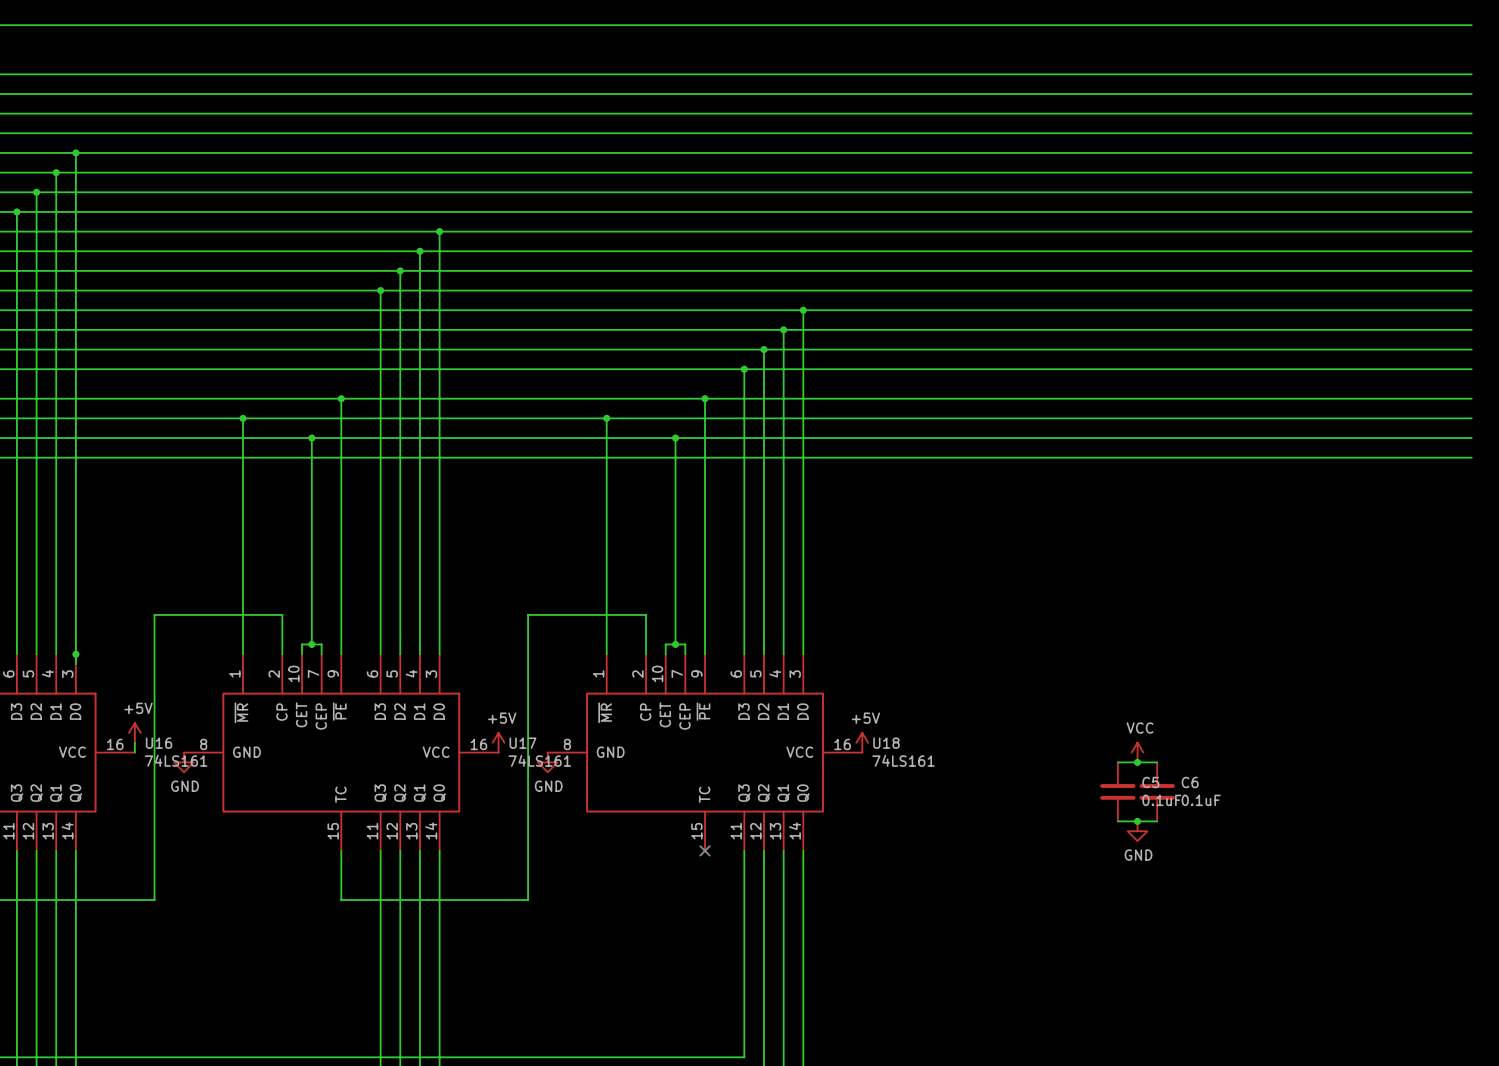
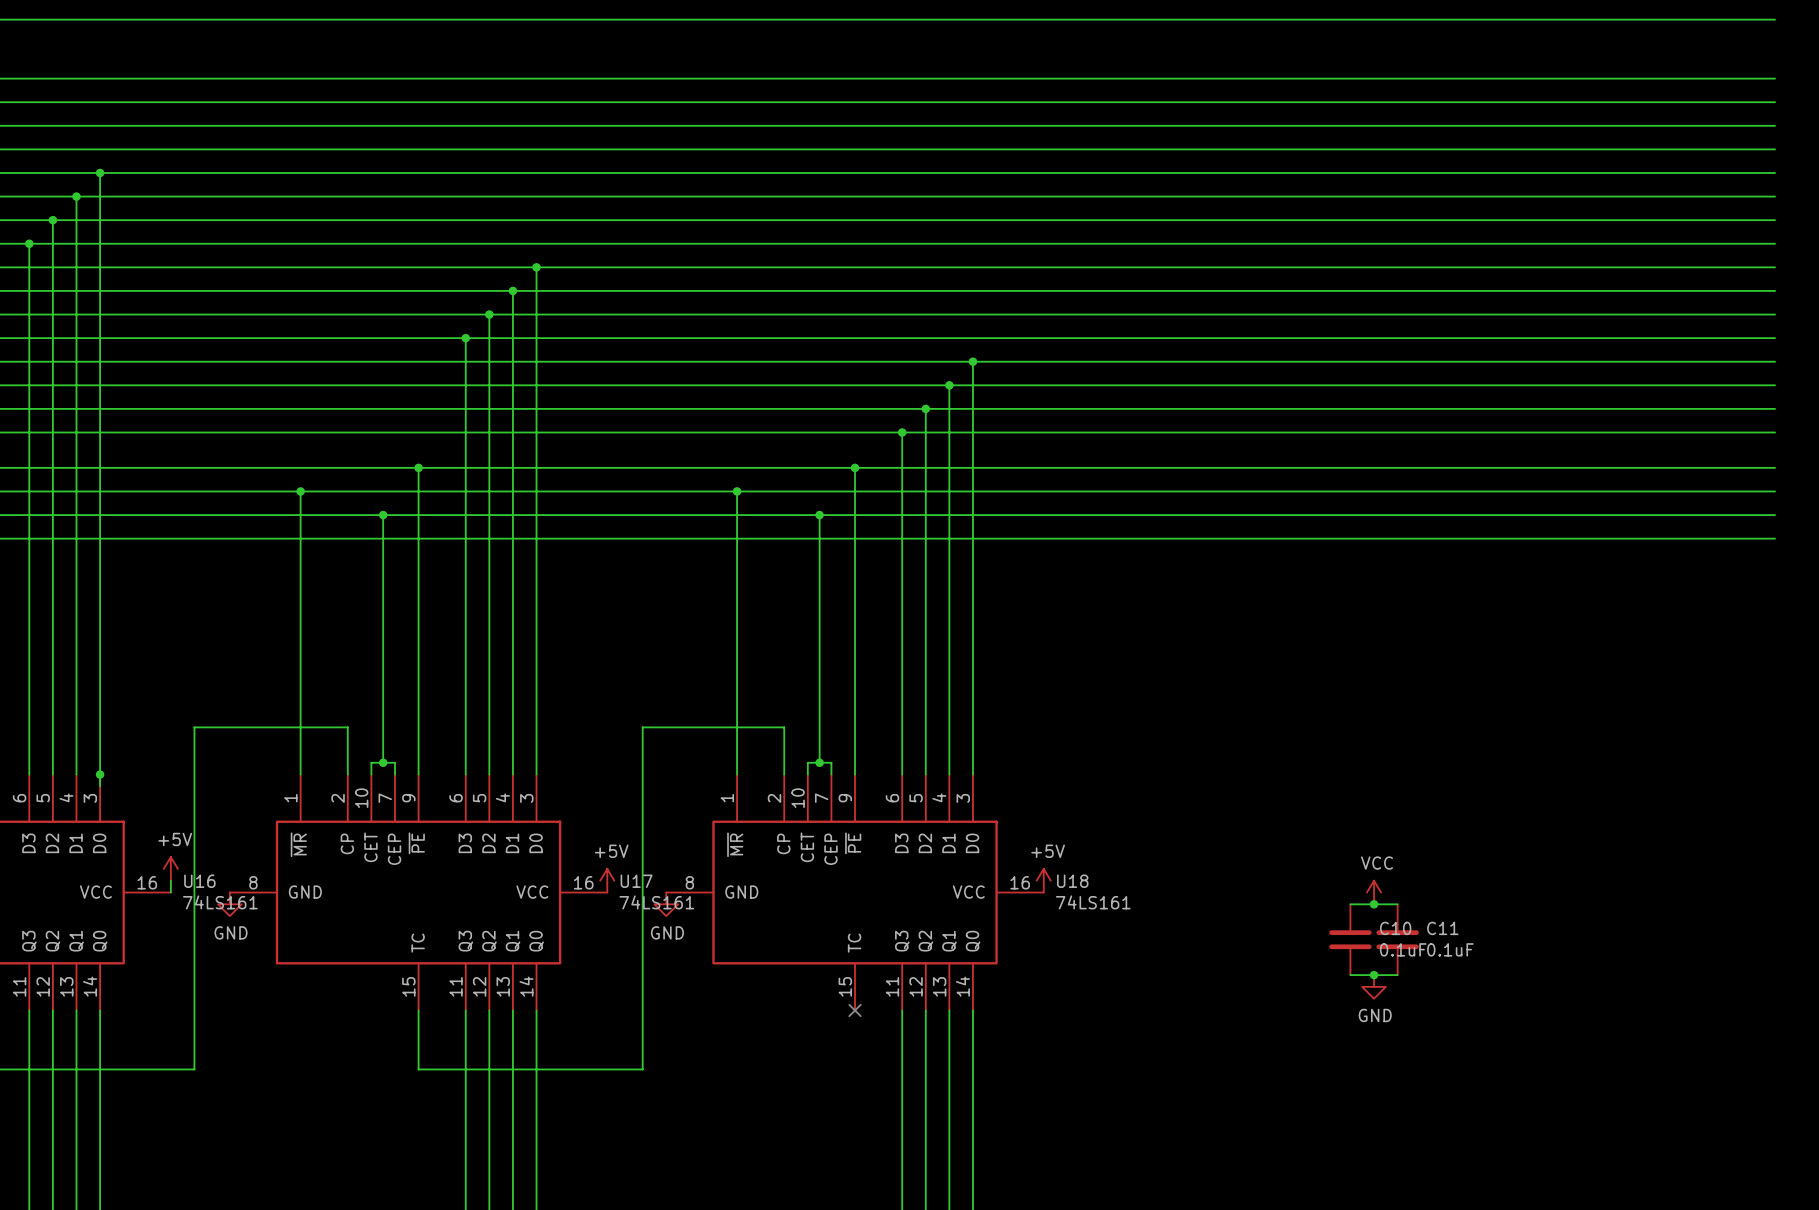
C5 name: C5 (1150, 782) -> C10 (1395, 928)
C6 name: C6 (1190, 782) -> C11 (1442, 928)

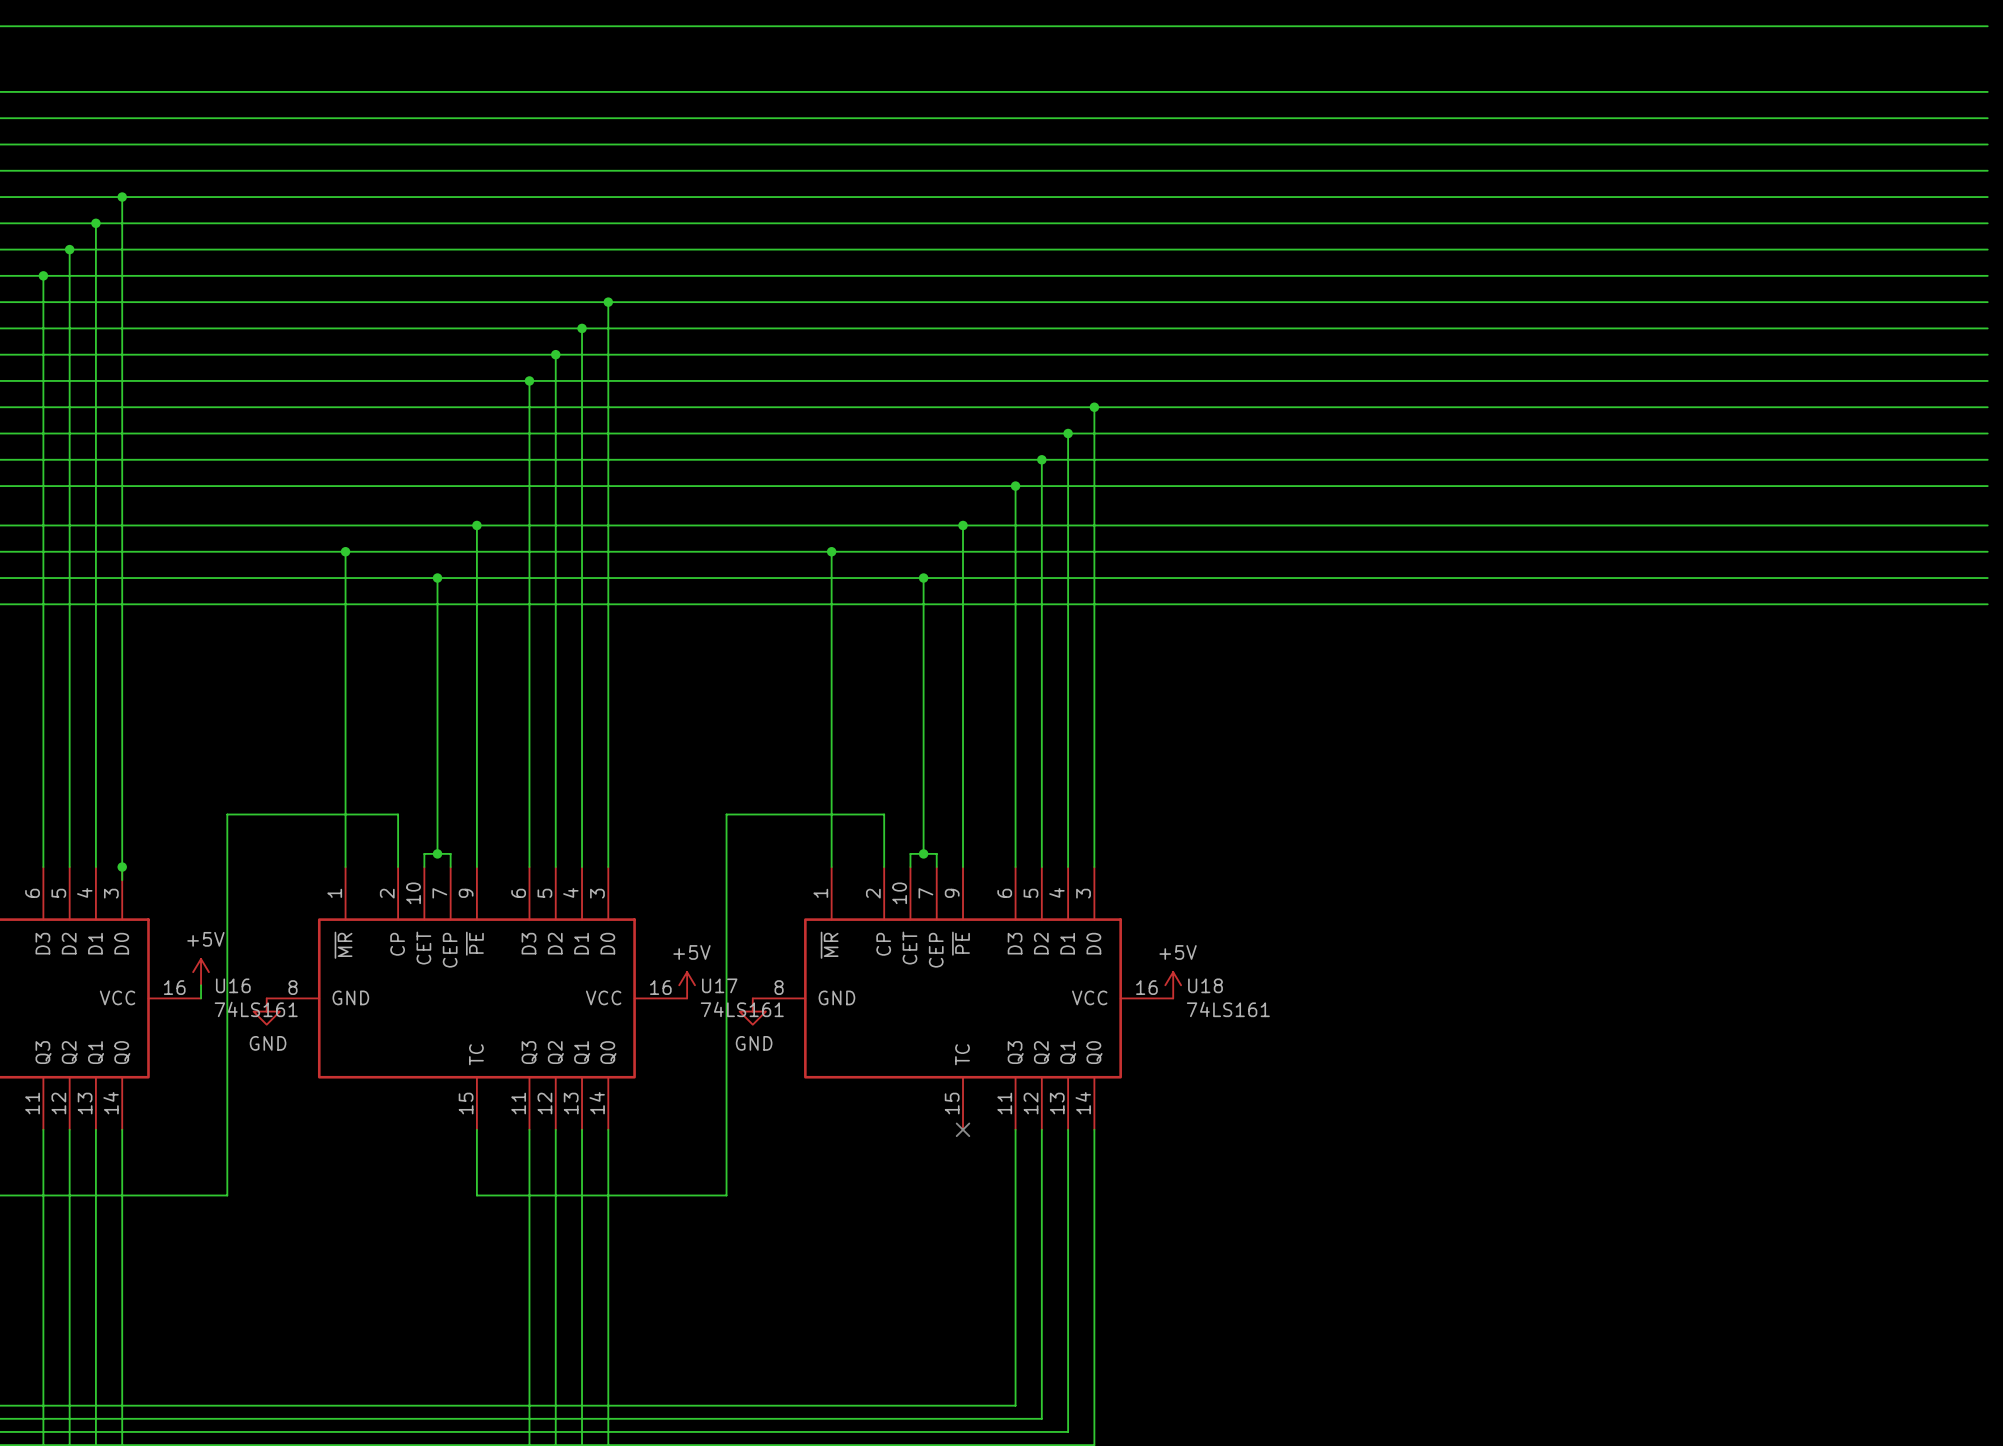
power symbol: VCC (1374, 892) -> none
wire: (1350, 904) (1397, 904) -> none
junction: (1374, 904) -> none
C10: 0.1uF (1350, 939) -> none
C11: 0.1uF (1397, 939) -> none
wire: (1350, 975) (1397, 975) -> none
junction: (1374, 975) -> none
power symbol: GND (1374, 986) -> none

